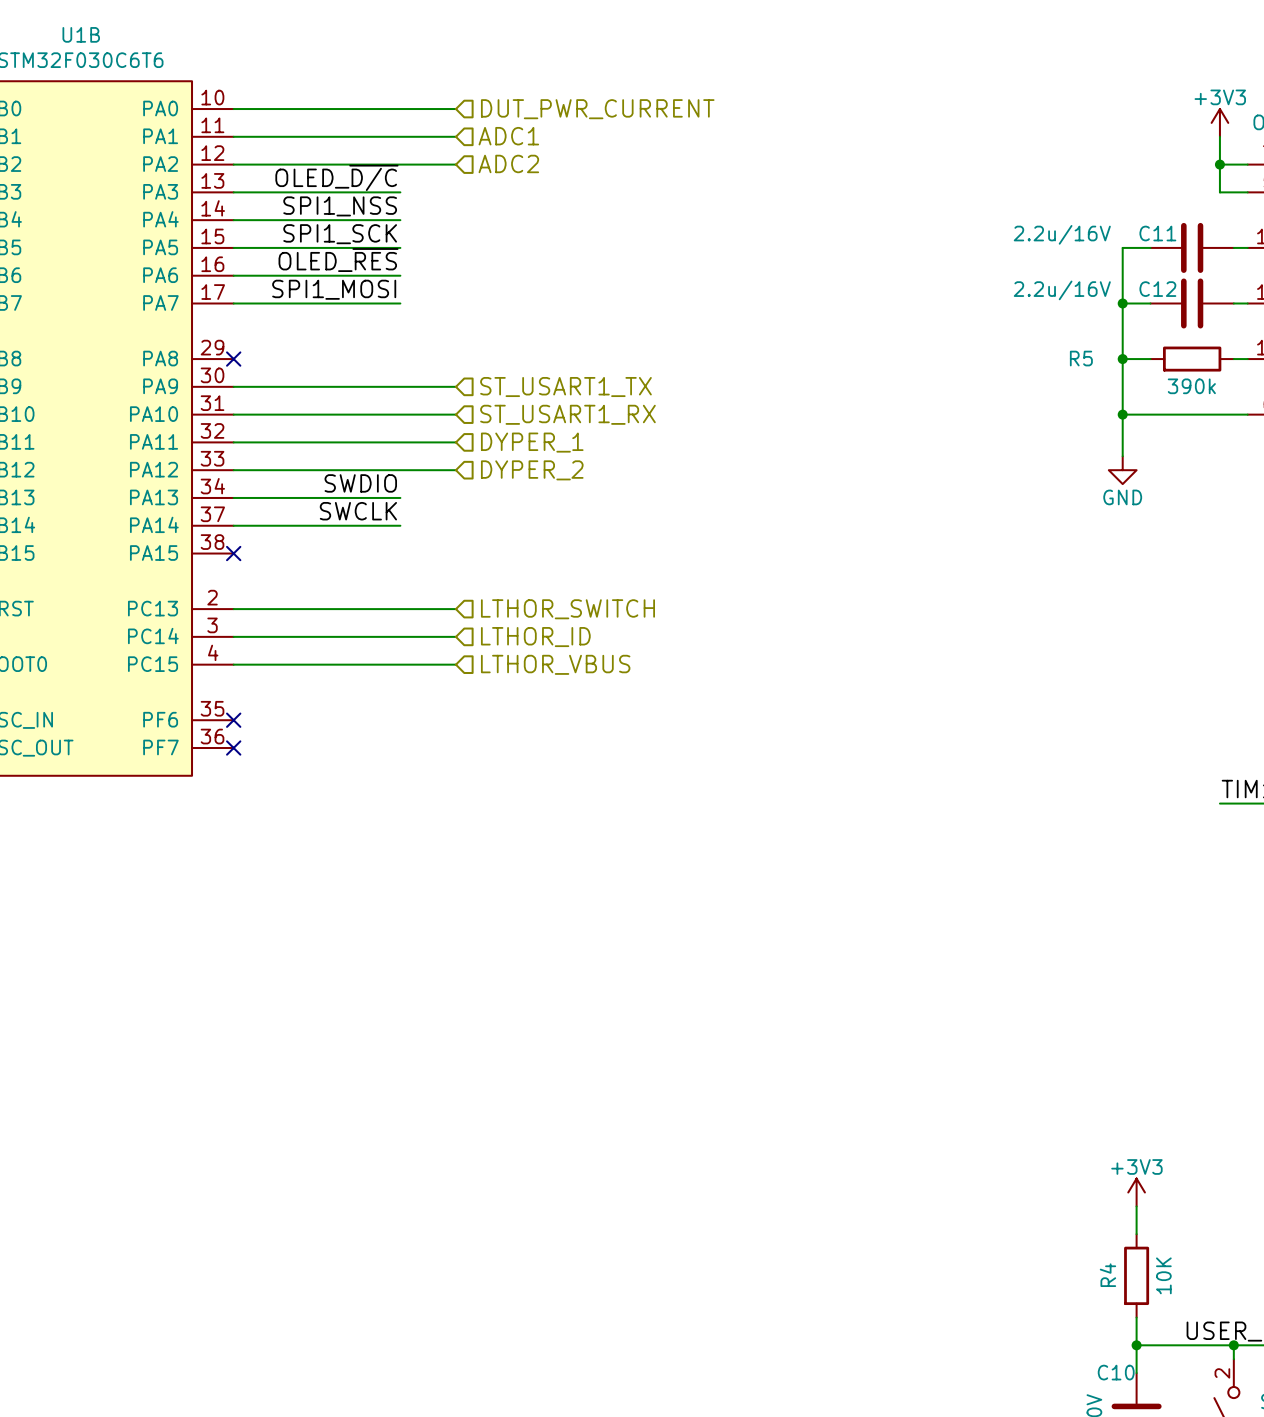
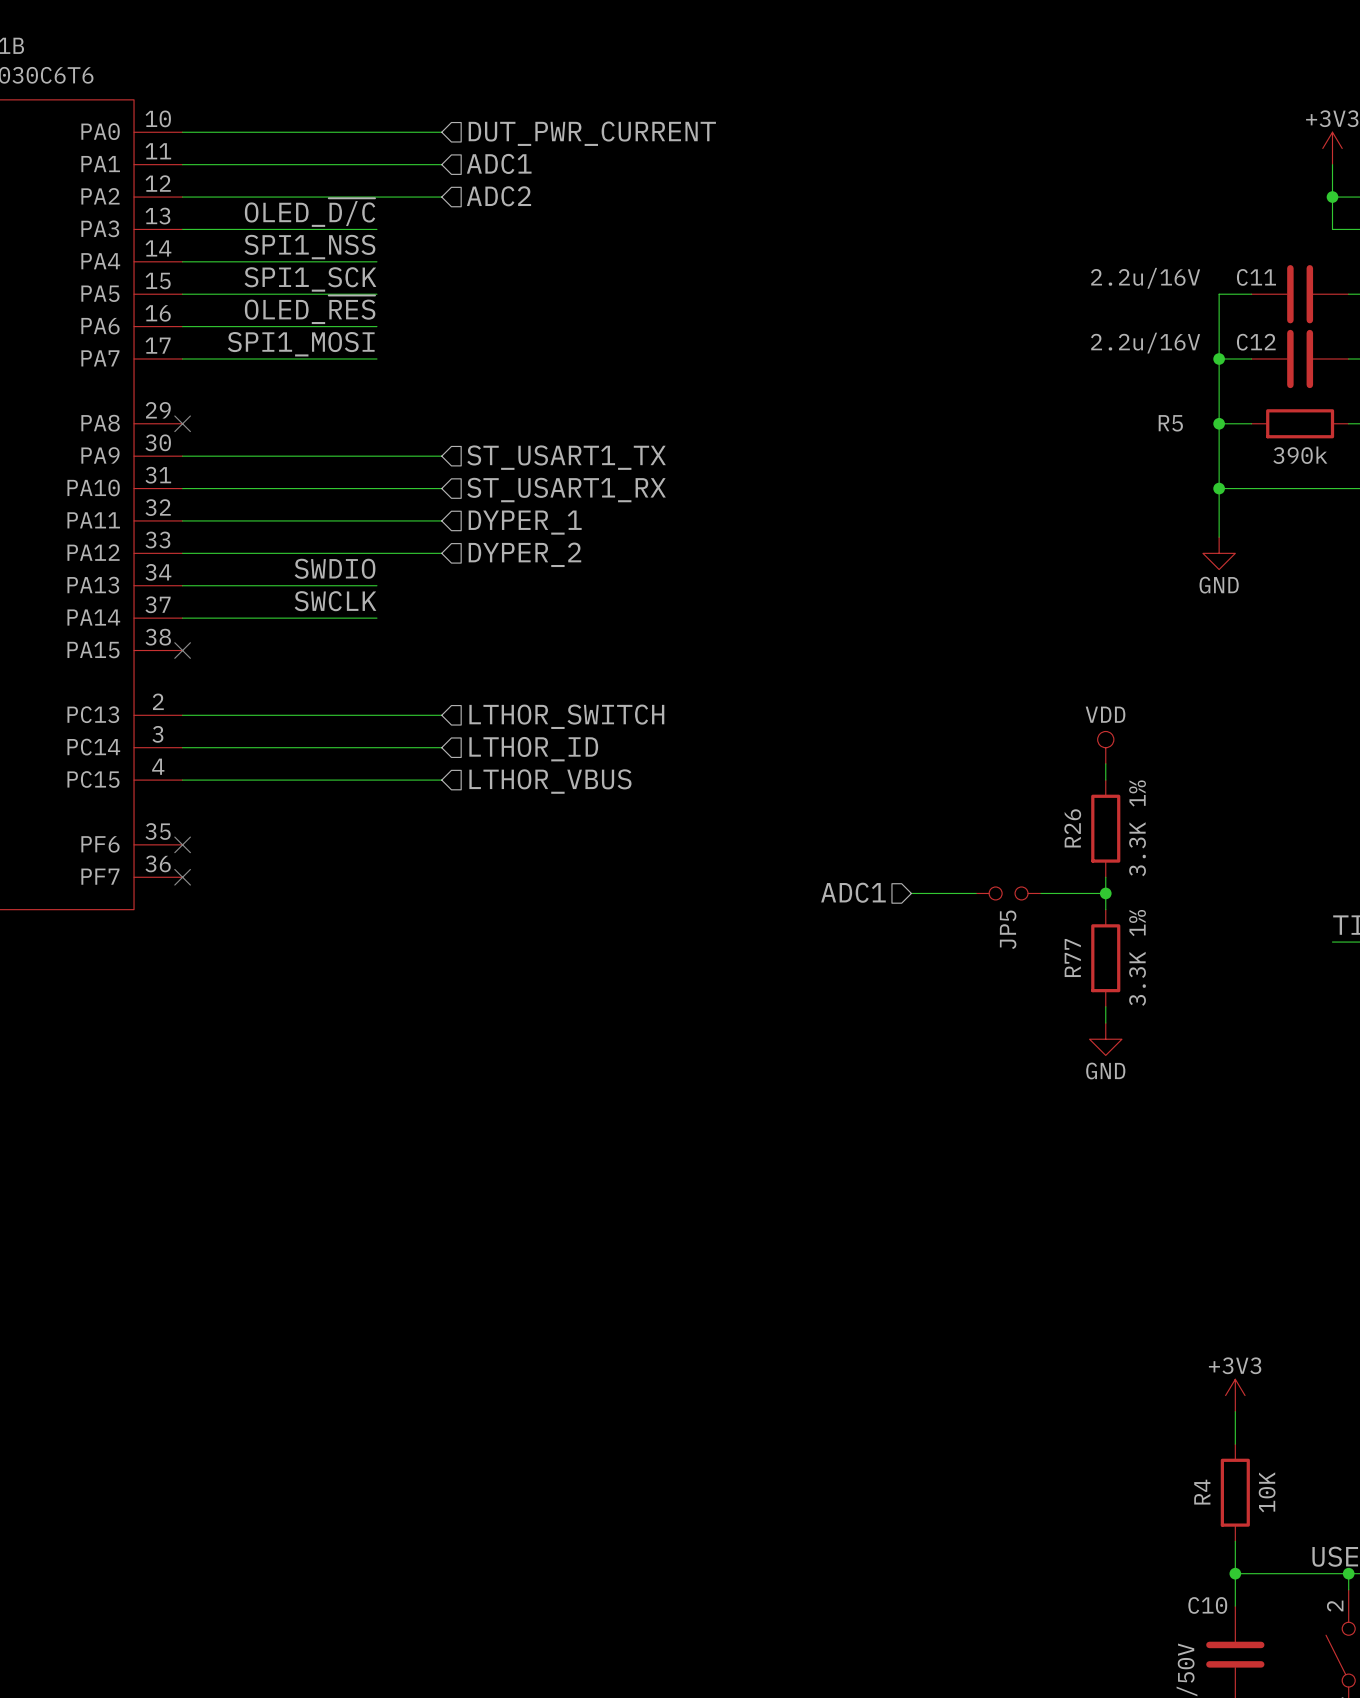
power symbol: none -> VDD (1105, 747)
wire: none -> (1105, 763) (1105, 780)
R26: none -> 3.3K 1% (1105, 828)
wire: none -> (1105, 877) (1105, 909)
hierarchical label: none -> ADC1 (853, 892)
wire: none -> (911, 893) (976, 893)
JP5: none -> (1008, 893)
wire: none -> (1040, 893) (1105, 893)
junction: none -> (1105, 893)
R77: none -> 3.3K 1% (1105, 958)
wire: none -> (1105, 1006) (1105, 1023)
power symbol: none -> GND (1105, 1039)

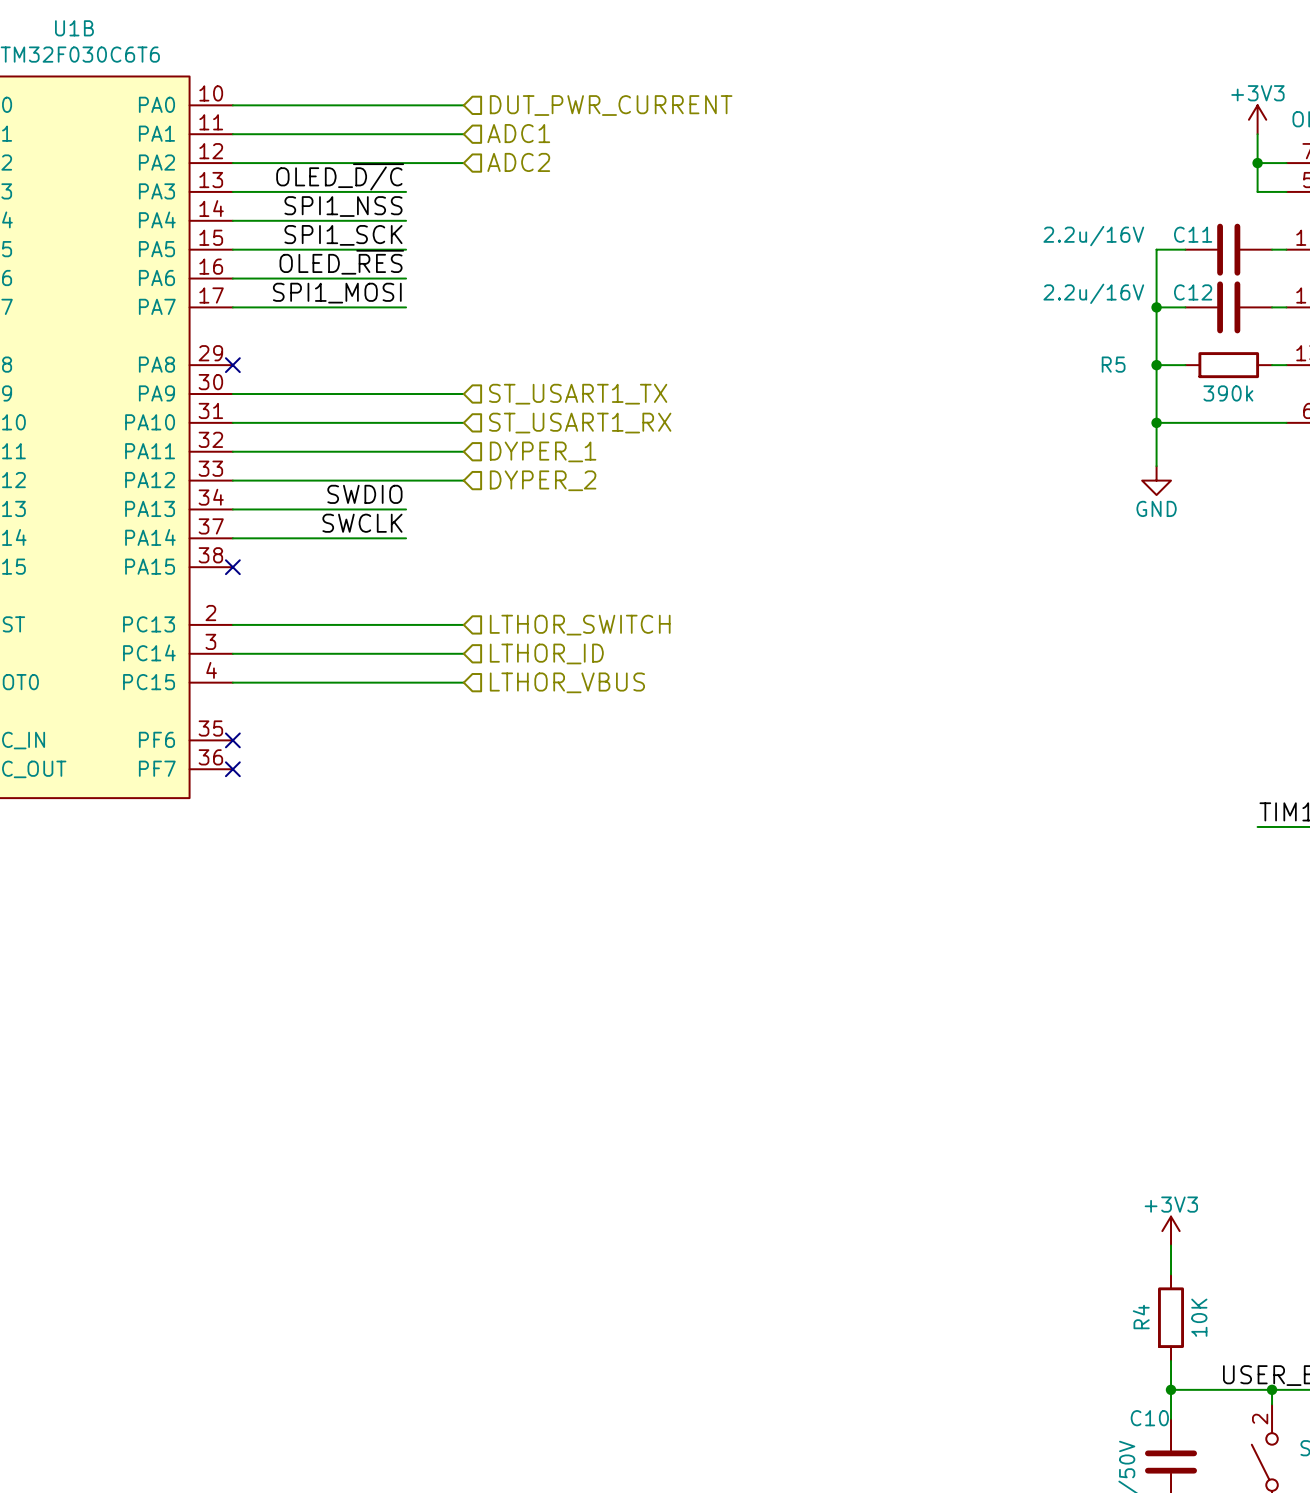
power symbol: VDD (1105, 747) -> none
wire: (1105, 763) (1105, 780) -> none
R26: 3.3K 1% (1105, 828) -> none
wire: (1105, 877) (1105, 909) -> none
hierarchical label: ADC1 (853, 892) -> none
wire: (911, 893) (976, 893) -> none
JP5: (1008, 893) -> none
wire: (1040, 893) (1105, 893) -> none
junction: (1105, 893) -> none
R77: 3.3K 1% (1105, 958) -> none
wire: (1105, 1006) (1105, 1023) -> none
power symbol: GND (1105, 1039) -> none

